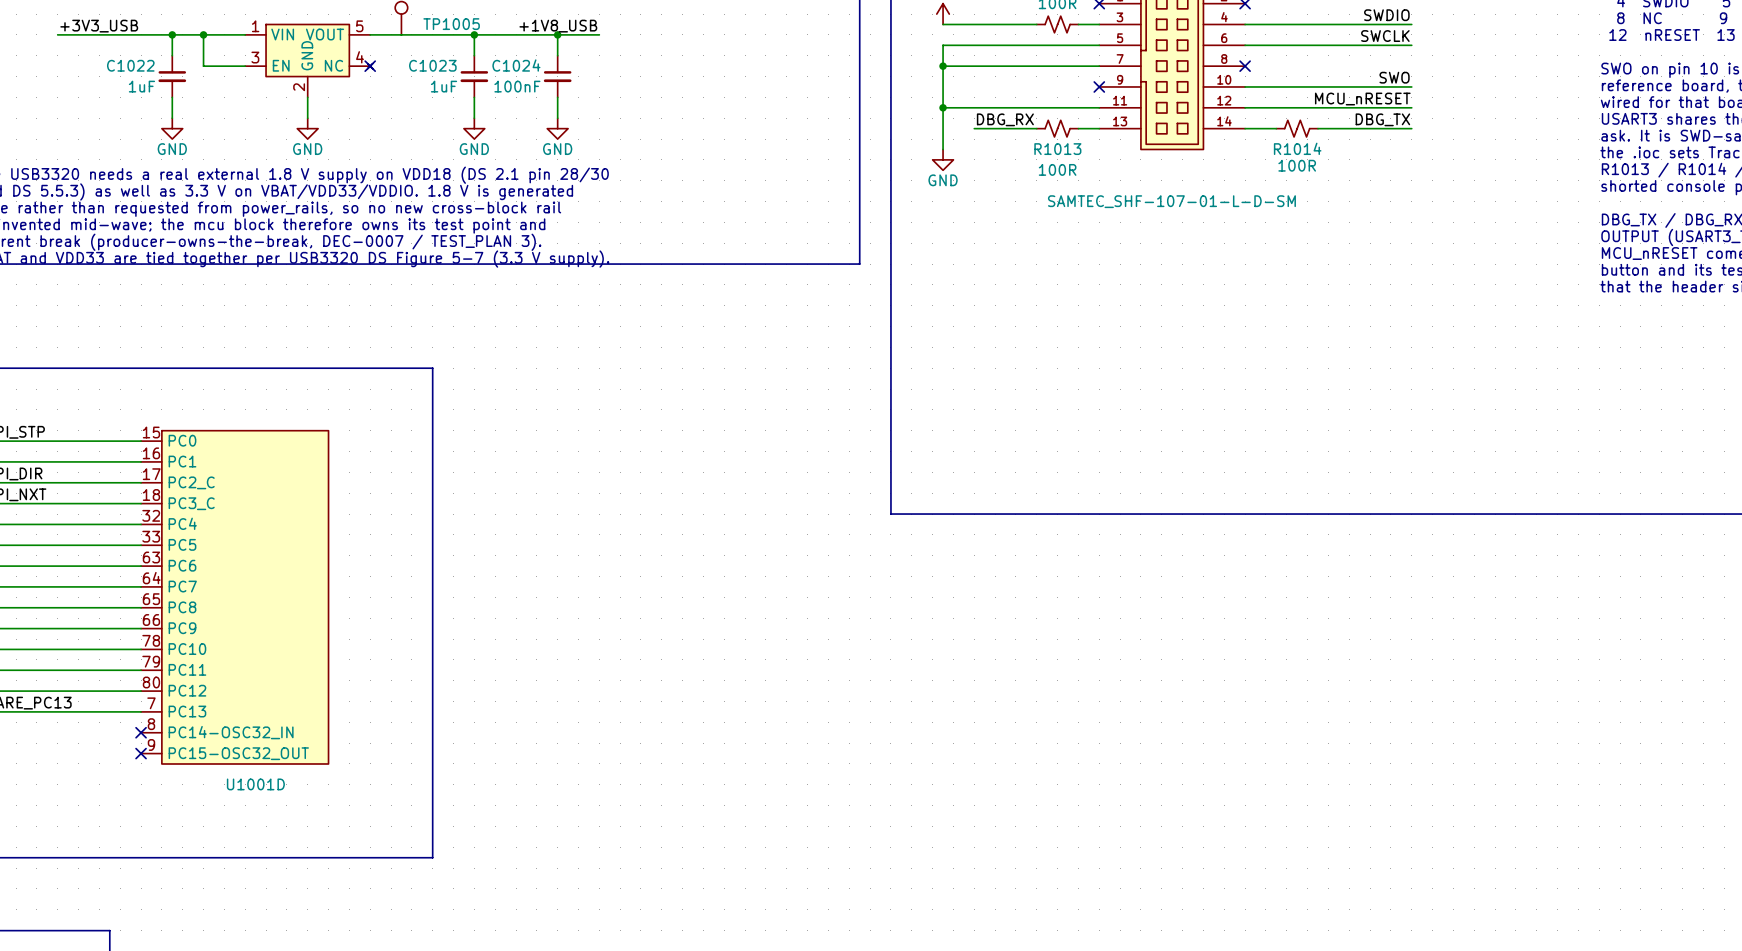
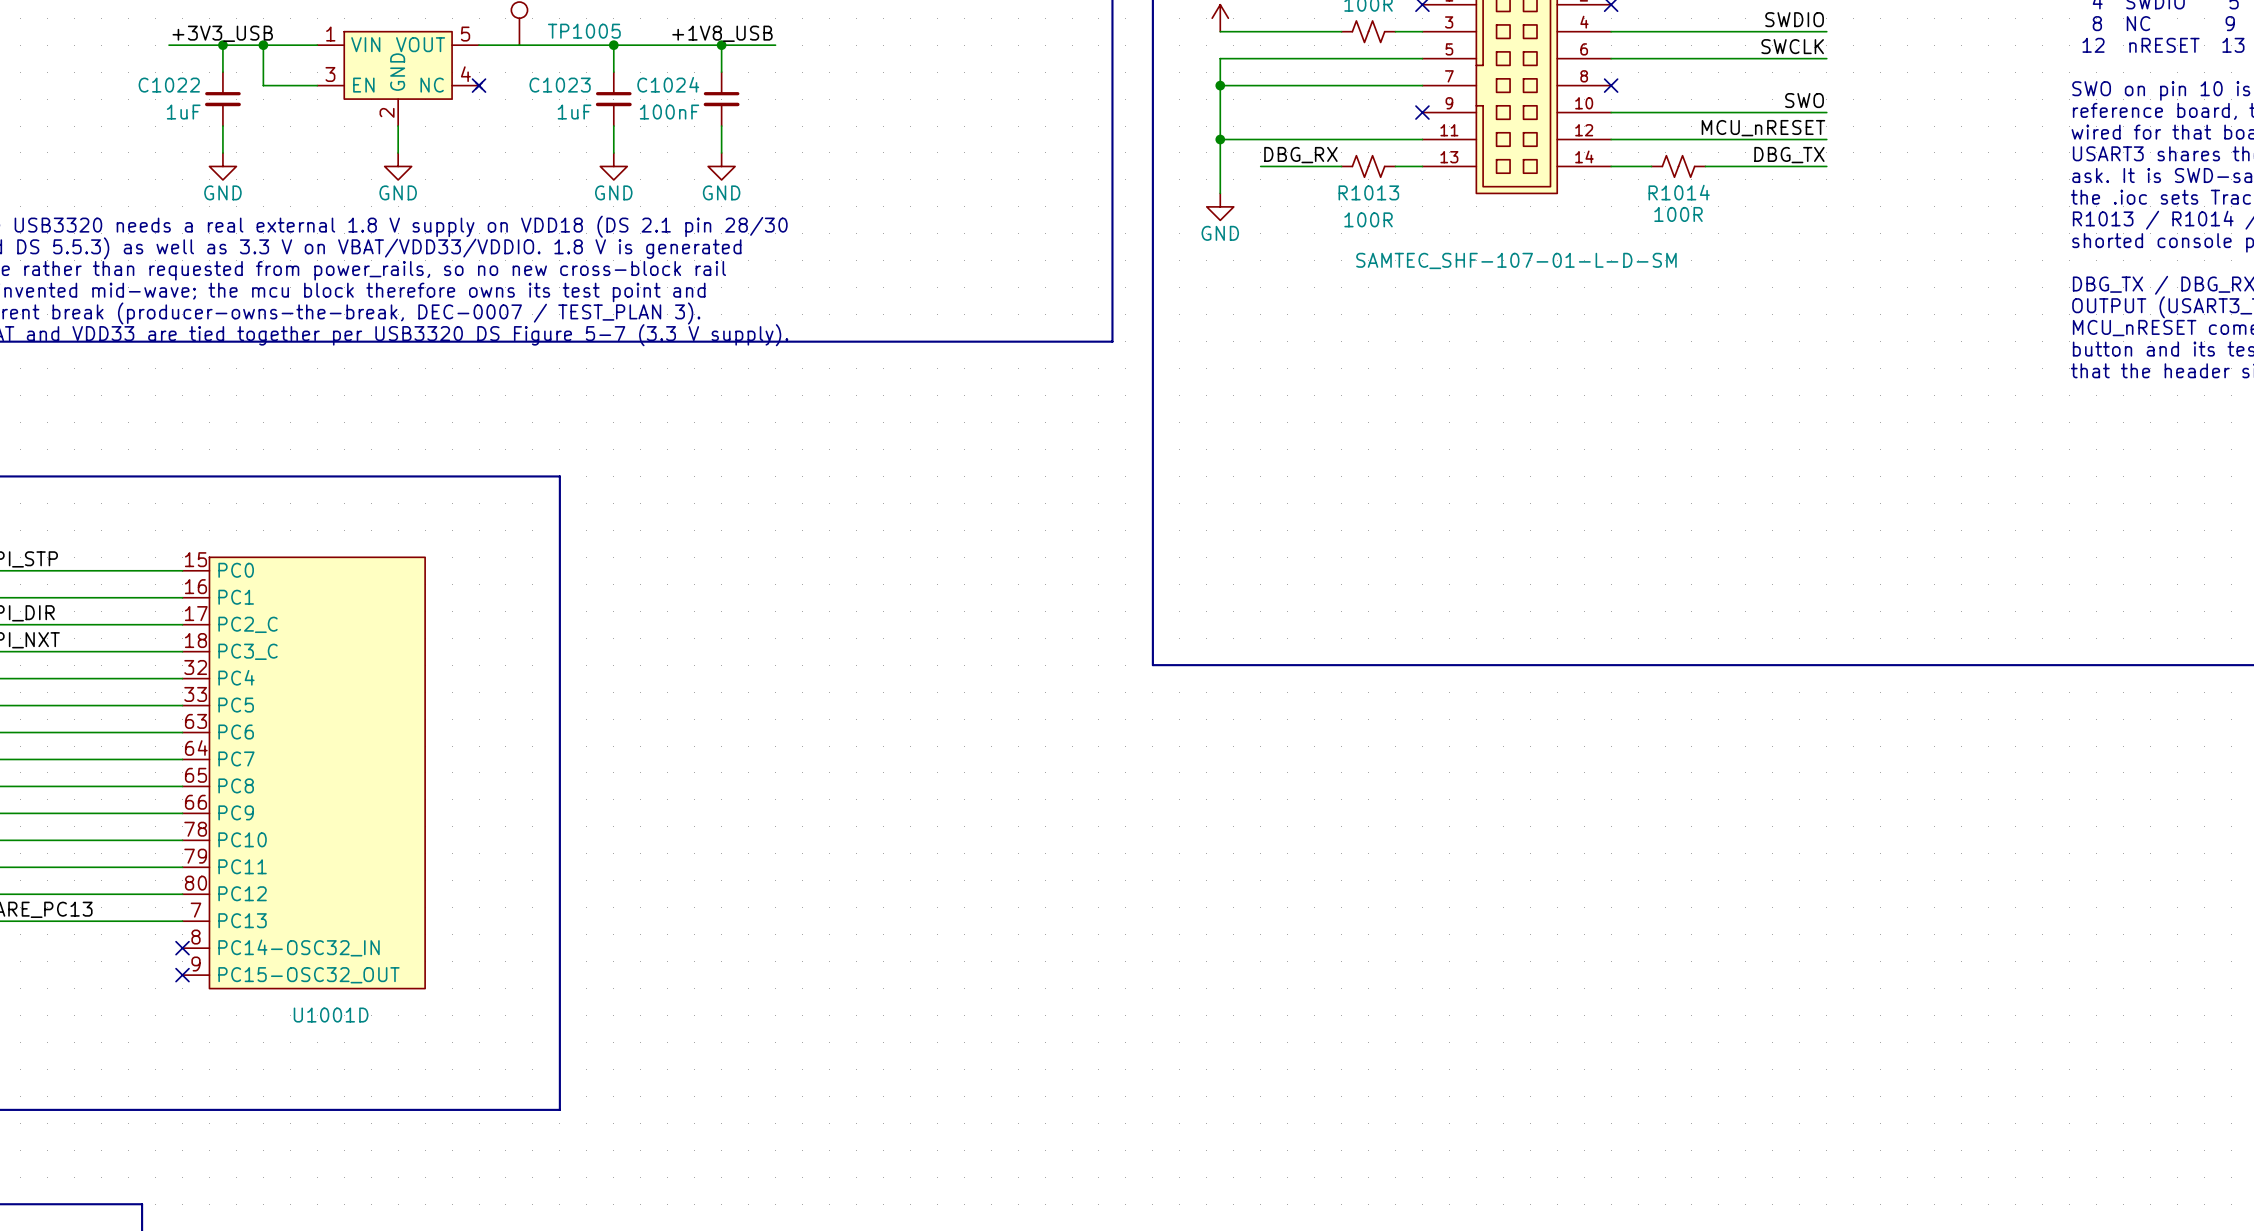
label position: +3V3_USB (99, 26) -> +3V3_USB (222, 33)
wire: (57, 34) (130, 34) -> none

